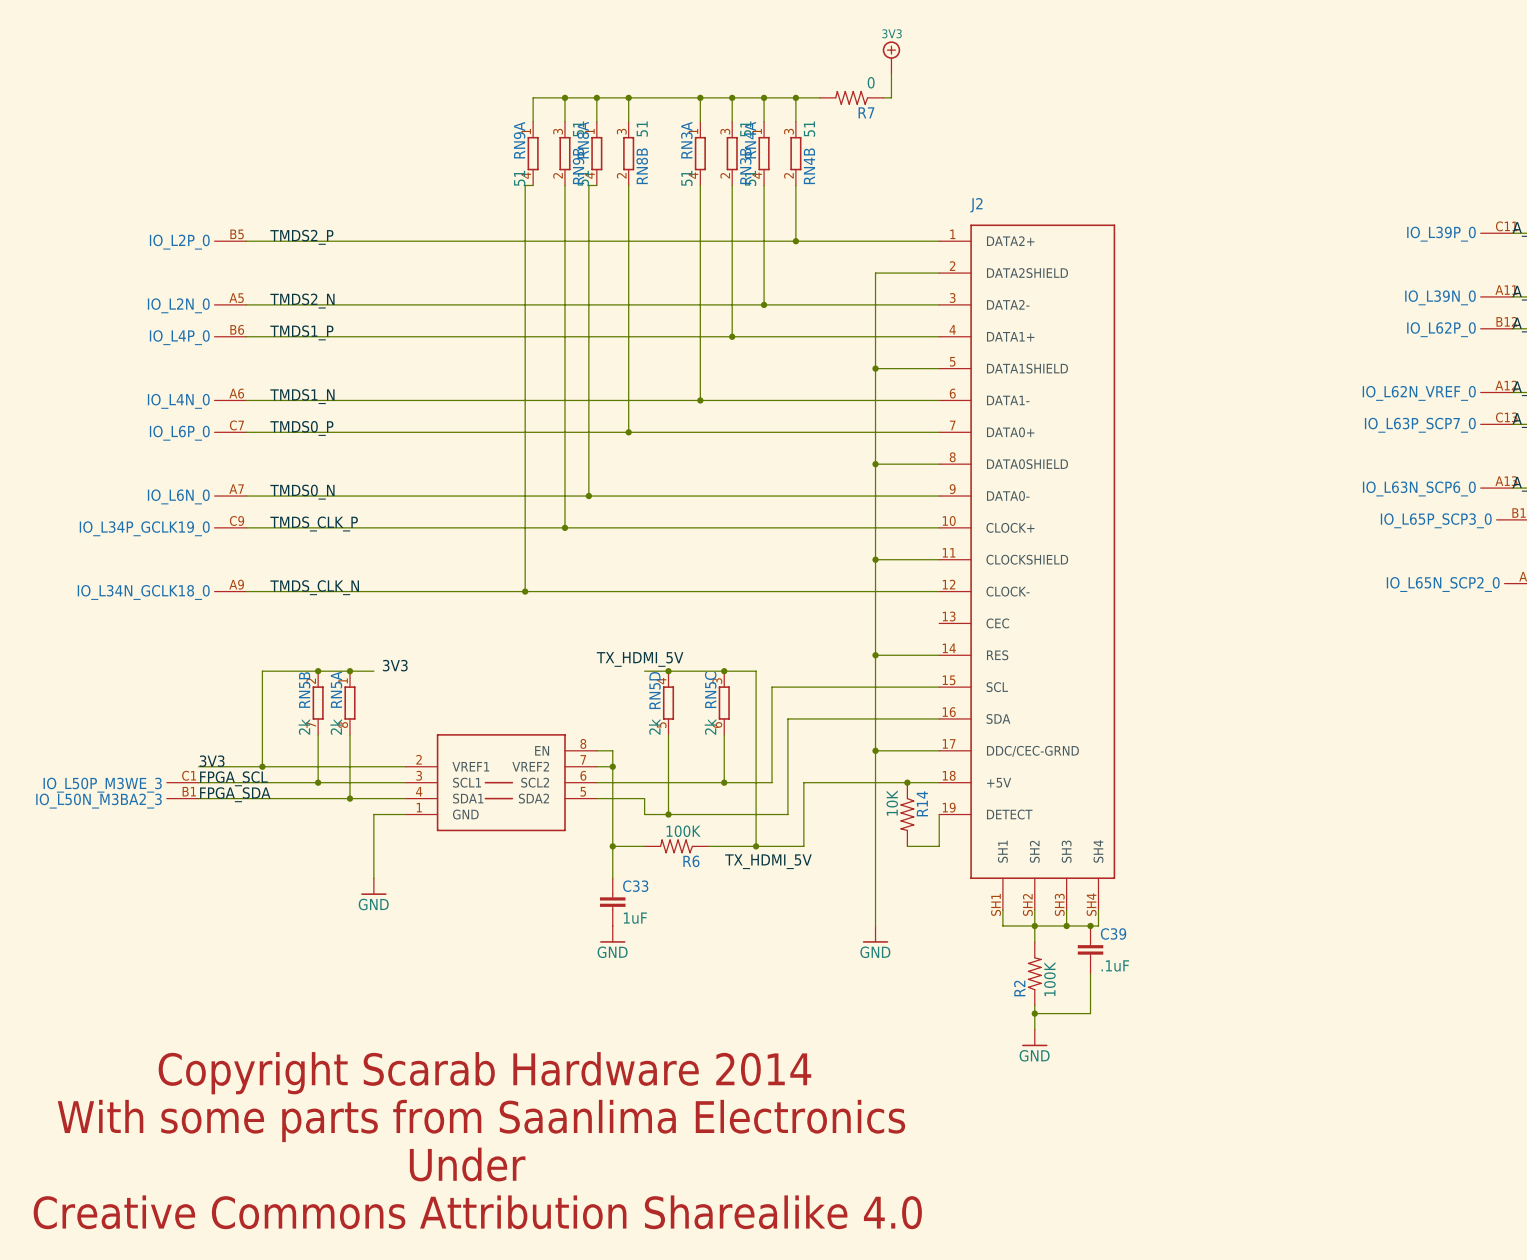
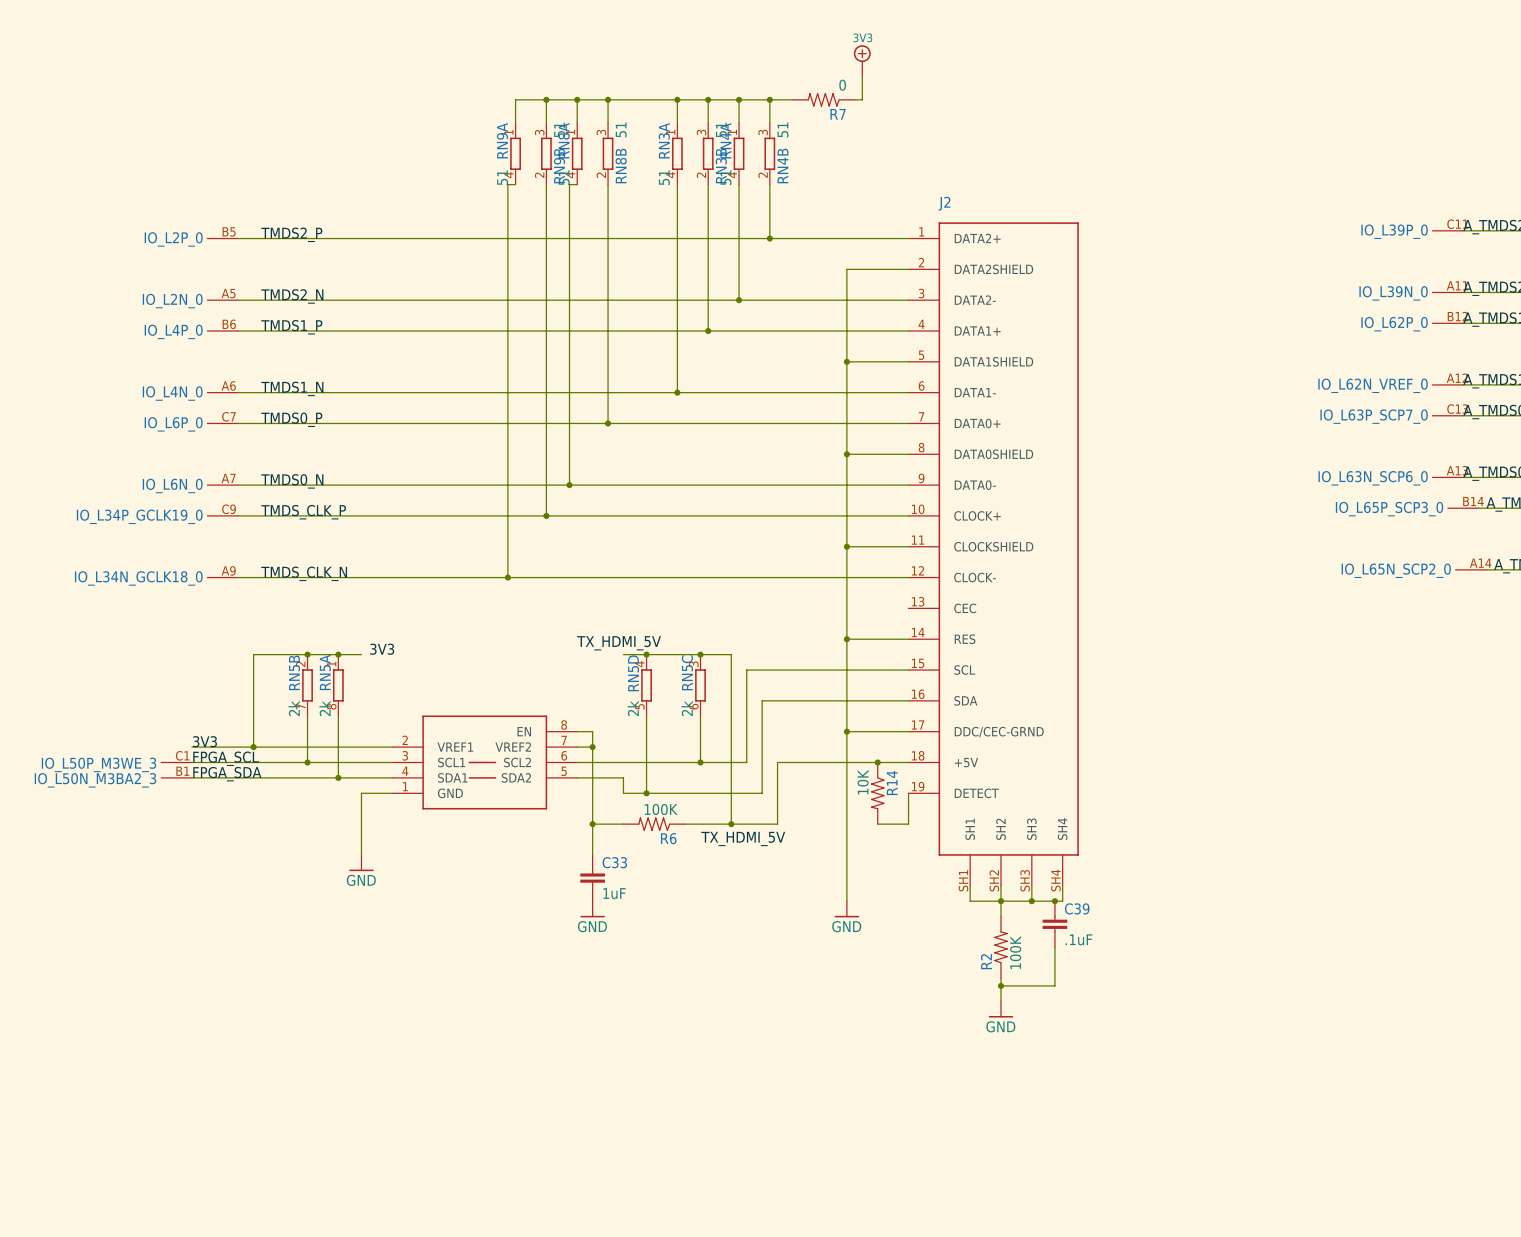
text: Copyright Scarab Hardware 2014 (484, 1073) -> none
text: With some parts from Saanlima Electronics (481, 1120) -> none
text: Under (467, 1164) -> none
text: Creative Commons Attribution Sharealike 4.0 (477, 1212) -> none

